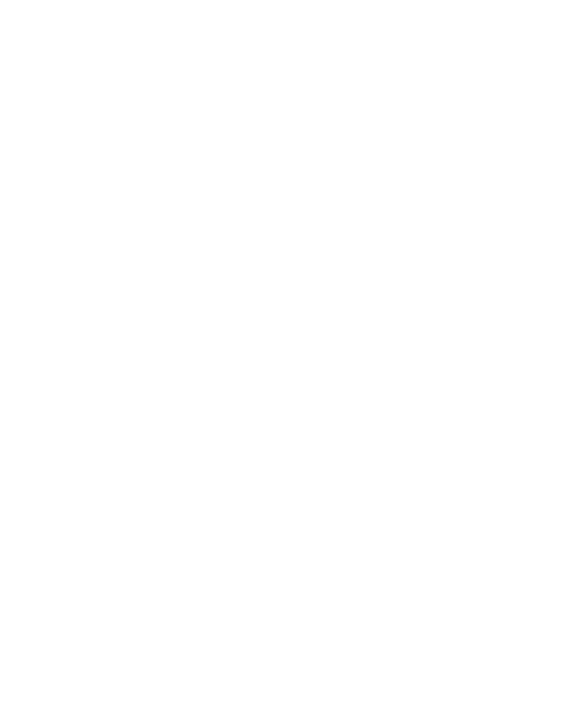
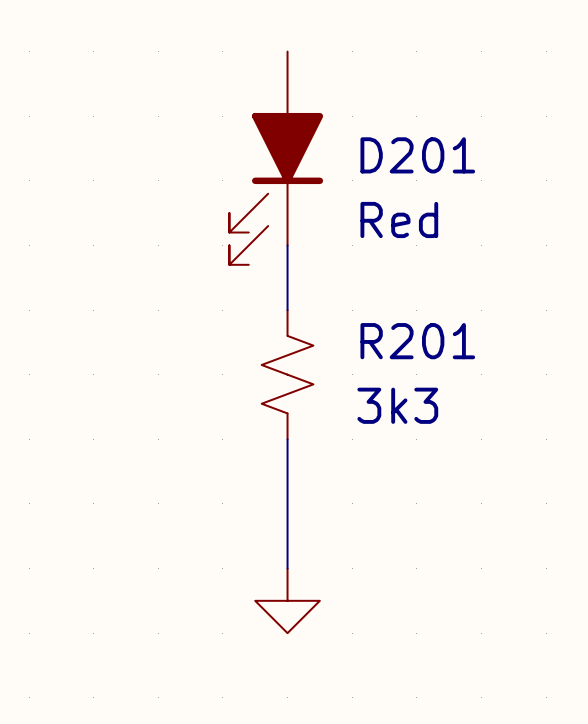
D201: none -> Red (276, 158)
wire: none -> (287, 245) (287, 310)
R201: none -> 3k3 (287, 374)
wire: none -> (287, 439) (287, 568)
power symbol: none -> (287, 600)

